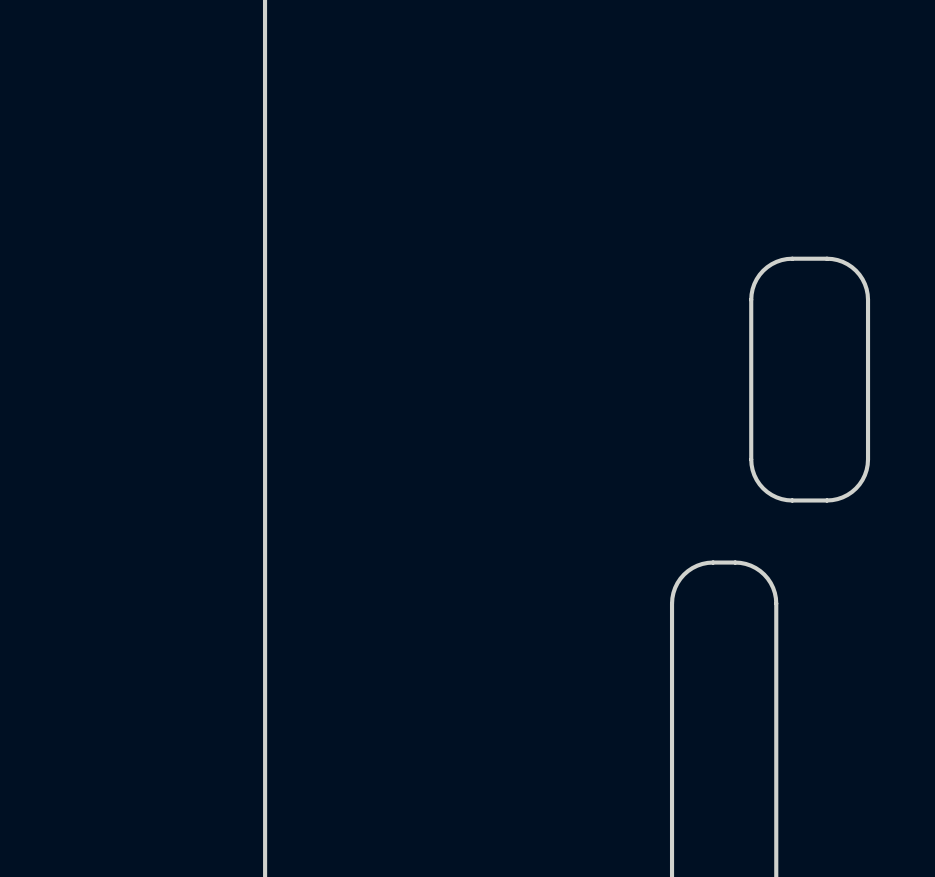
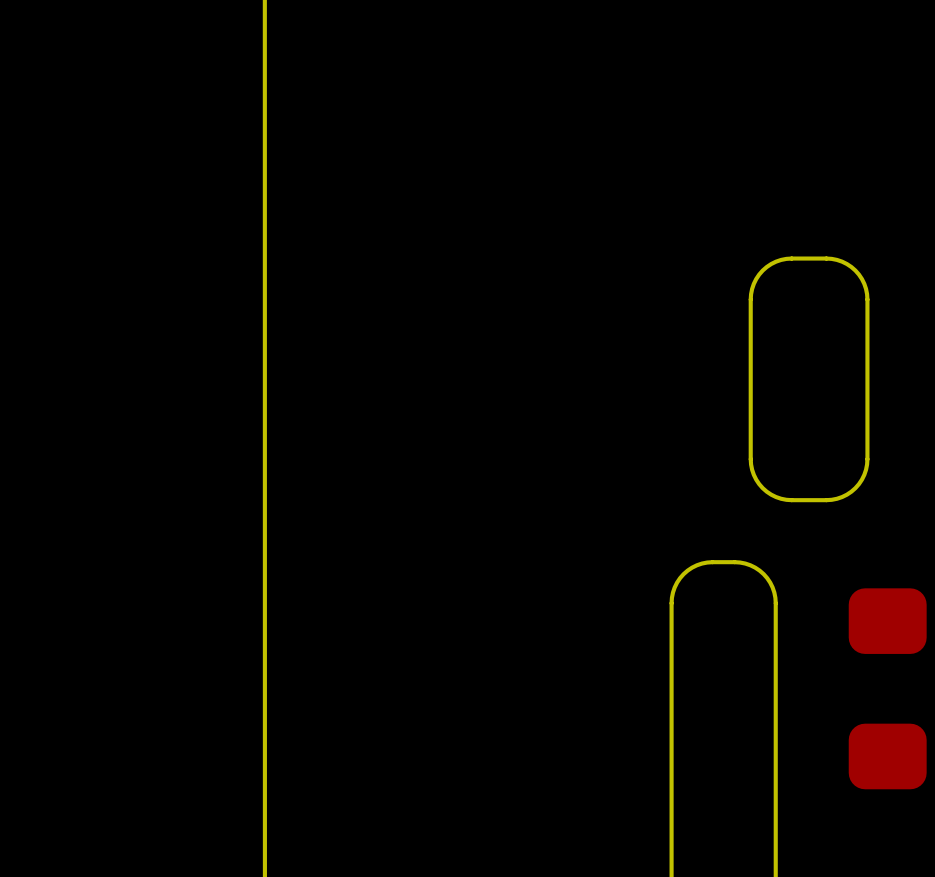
part: none -> (887, 688)

